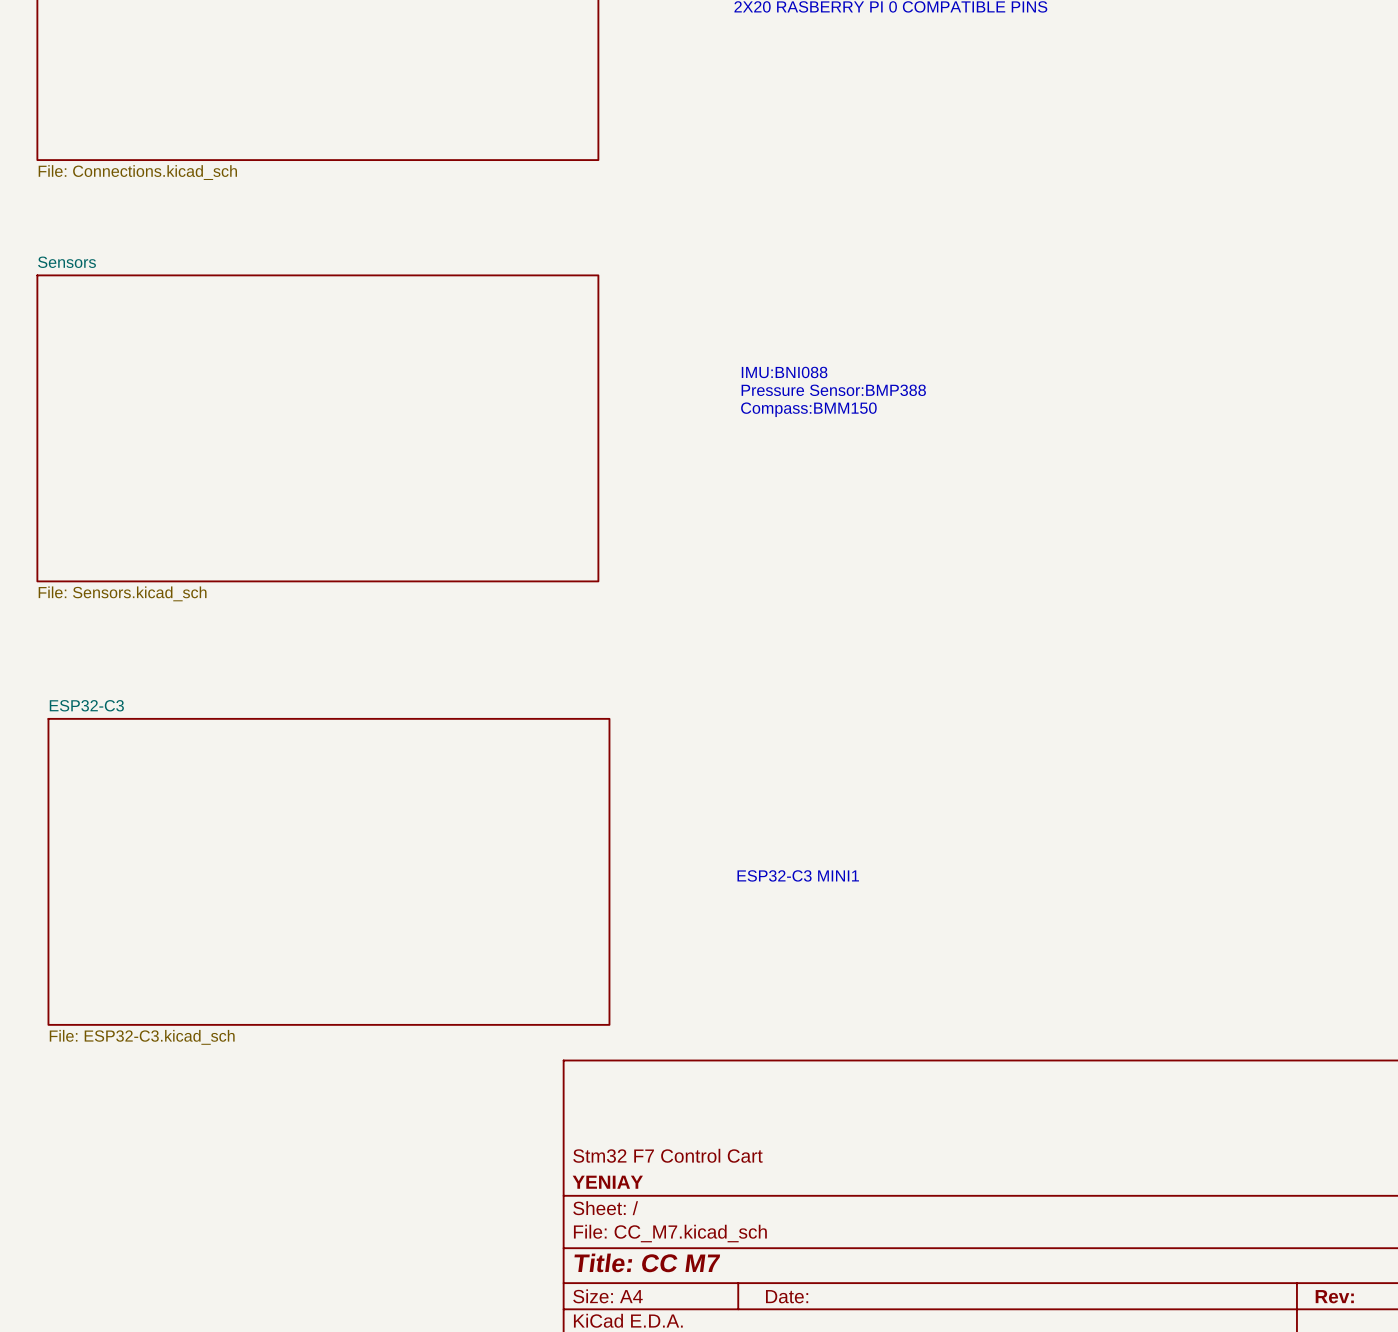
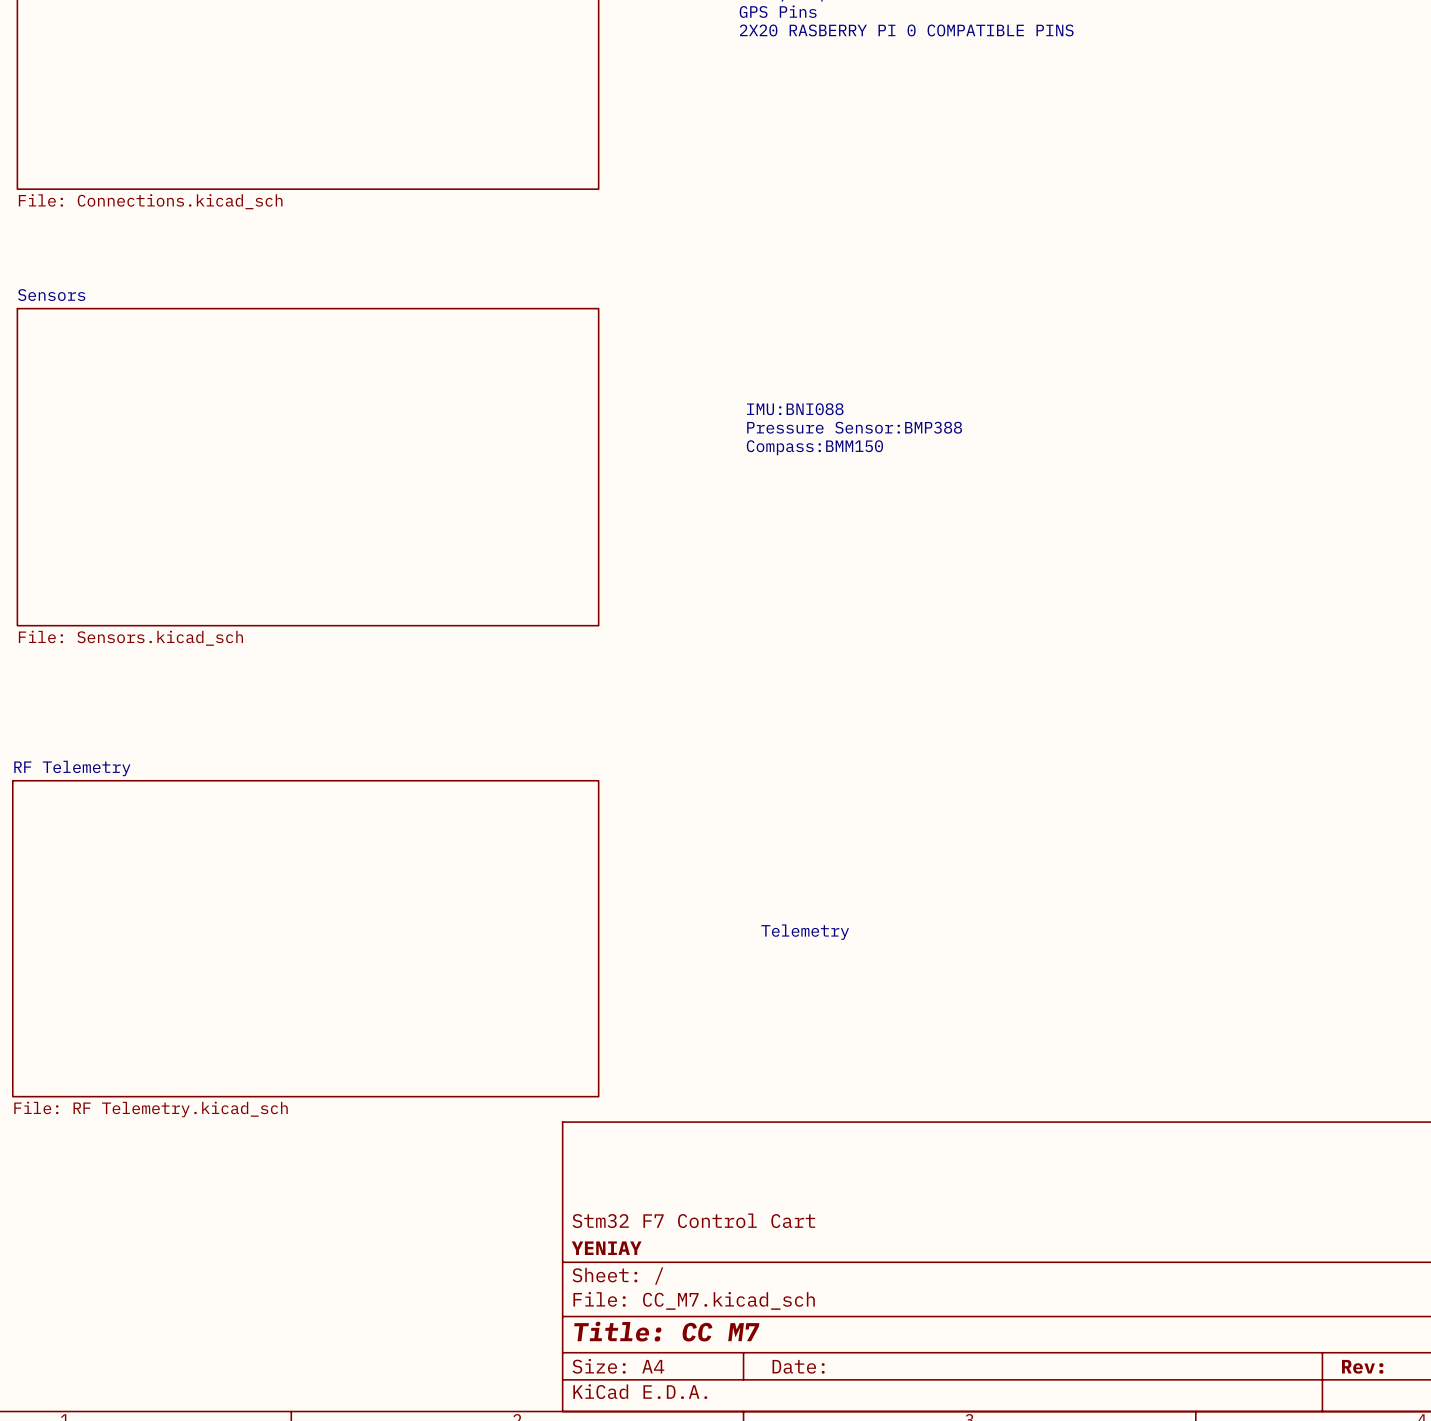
sheet ESP32-C3: File: ESP32-C3.kicad_sch (328, 871) -> none
text: ESP32-C3 MINI1 (798, 875) -> Telemetry (805, 932)
sheet RF Telemetry: none -> File: RF Telemetry.kicad_sch (305, 938)

